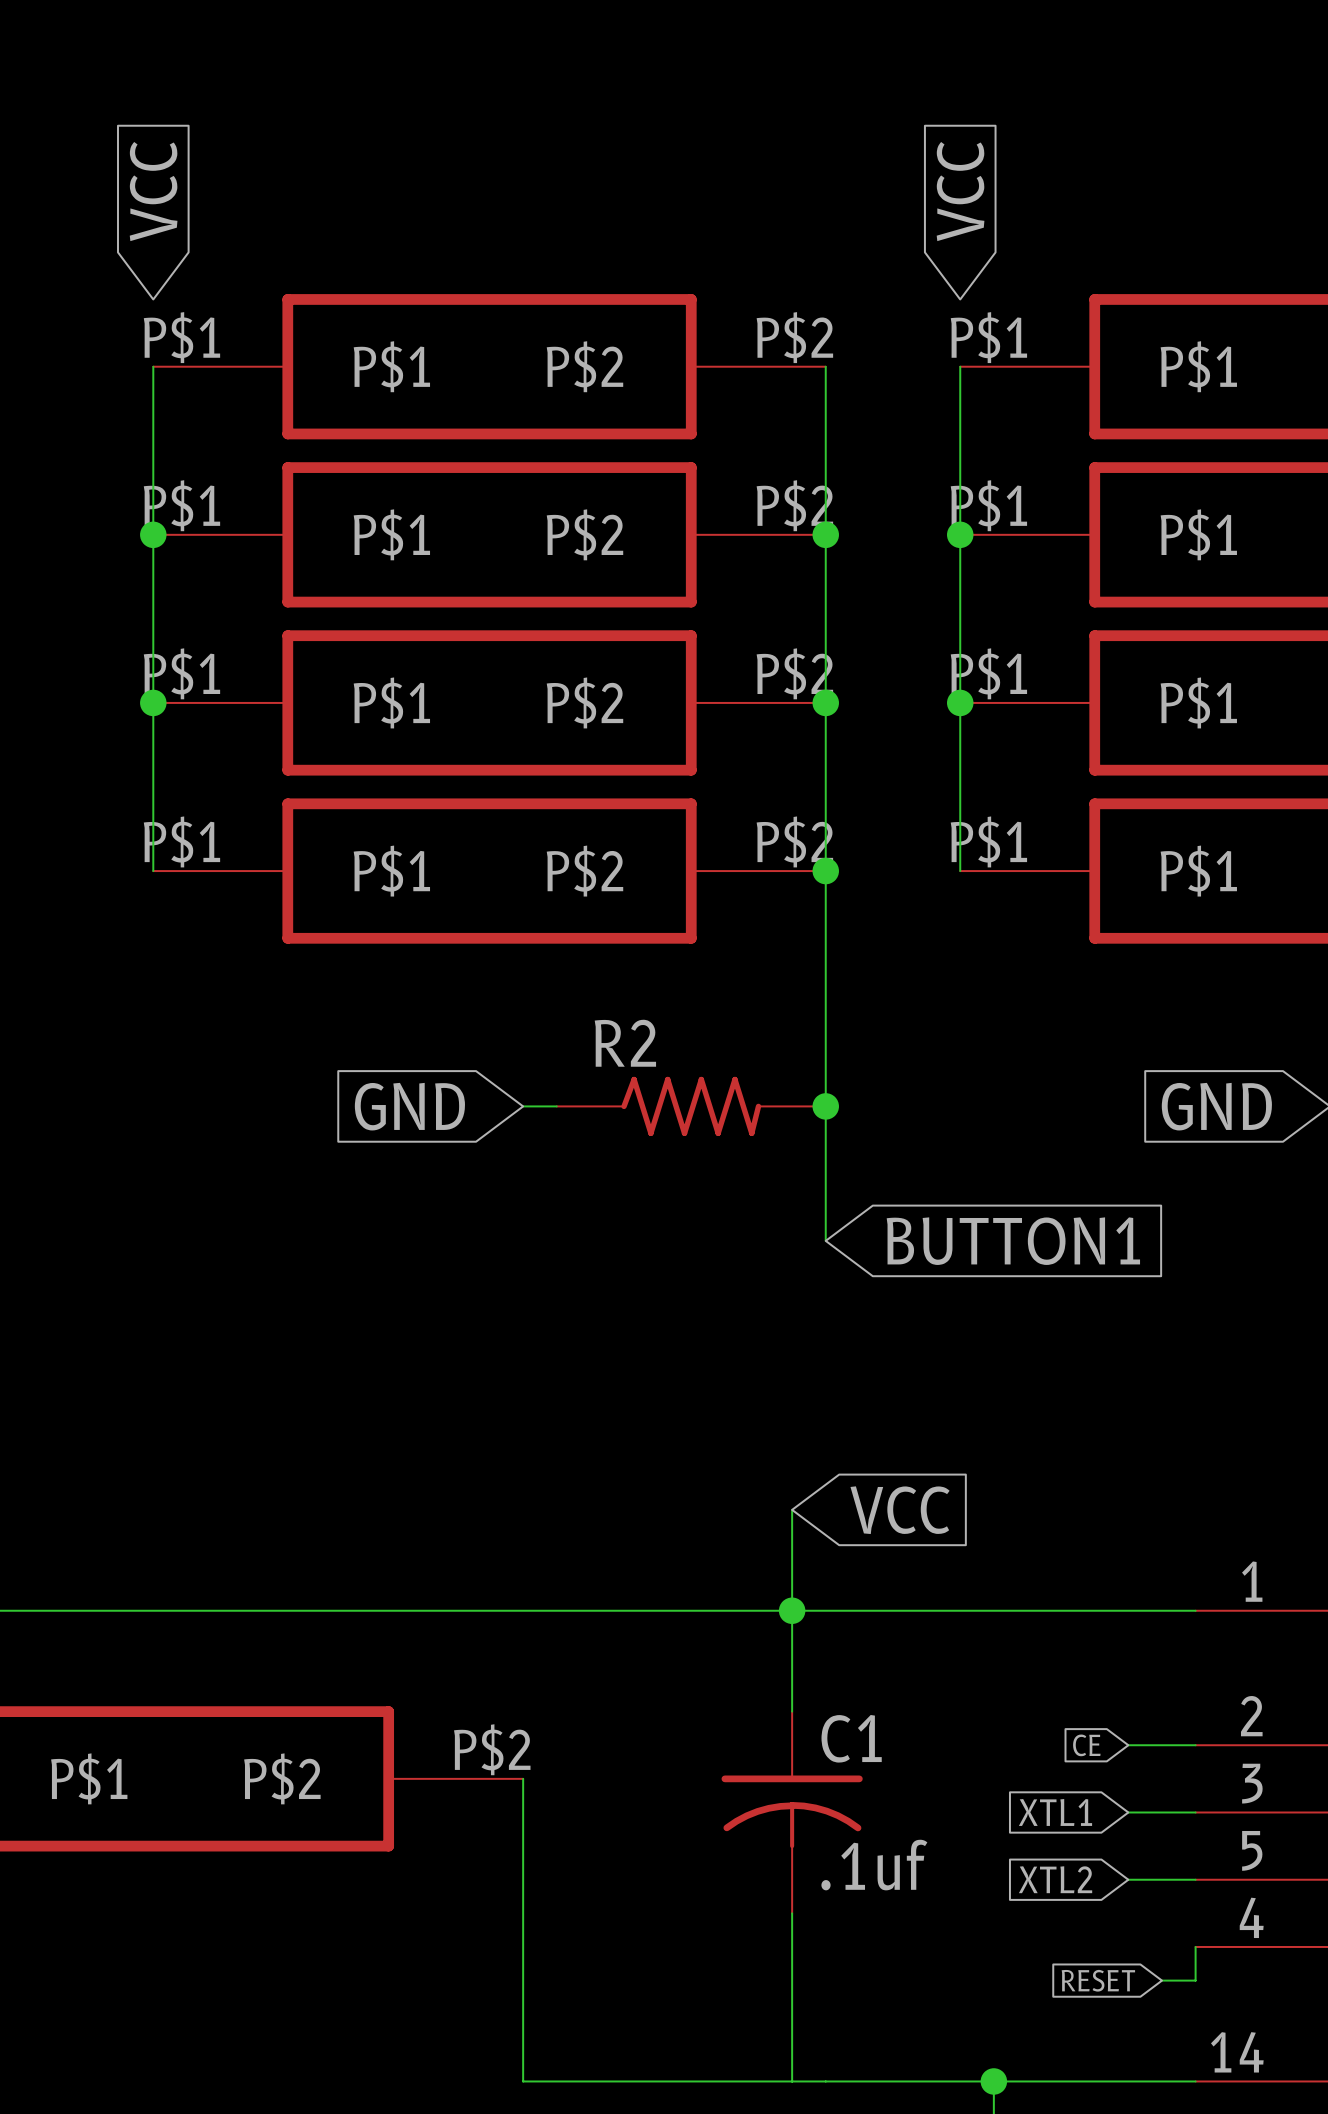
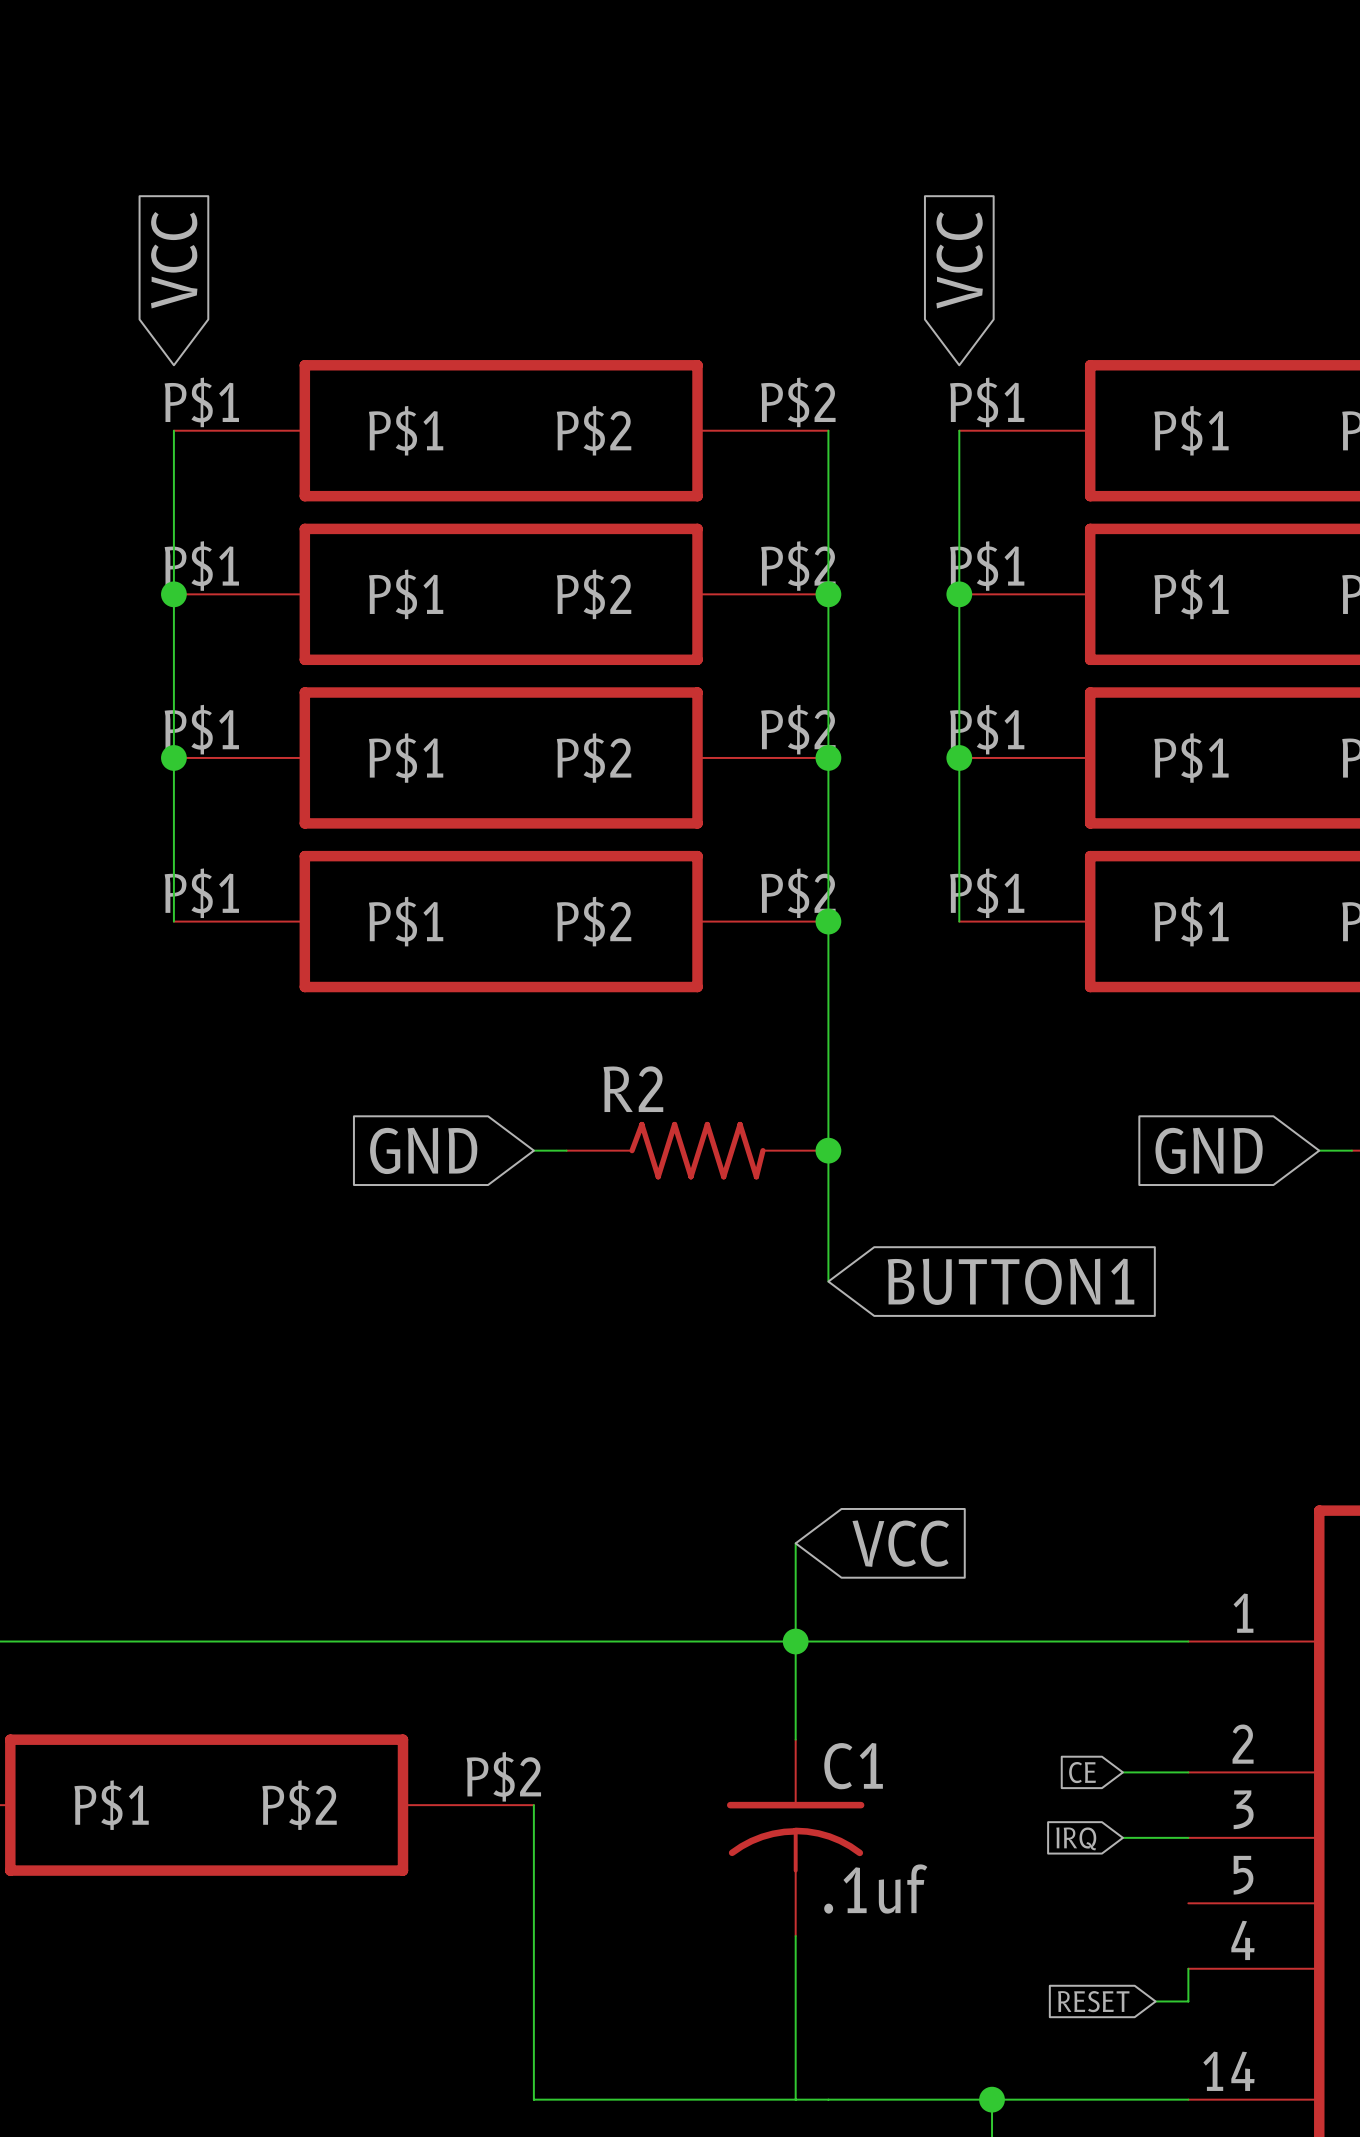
global label: XTL1 (1055, 1812) -> IRQ (1076, 1838)
global label: XTL2 (1055, 1879) -> none
wire: (1128, 1879) (1195, 1879) -> none

